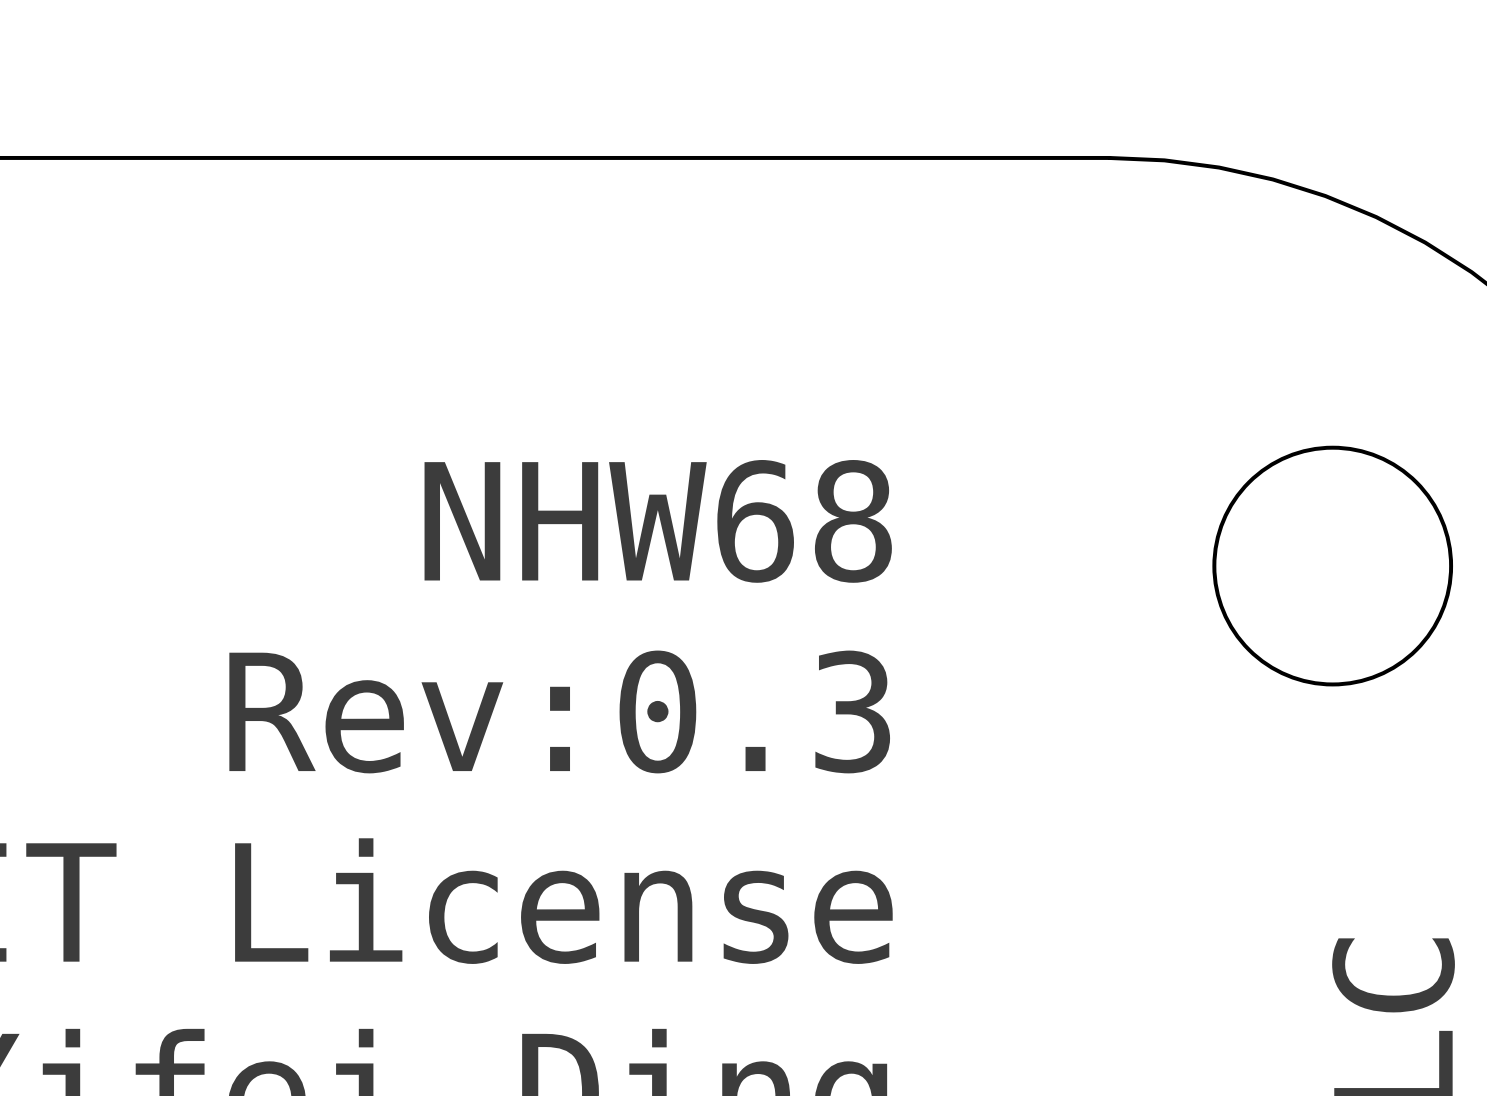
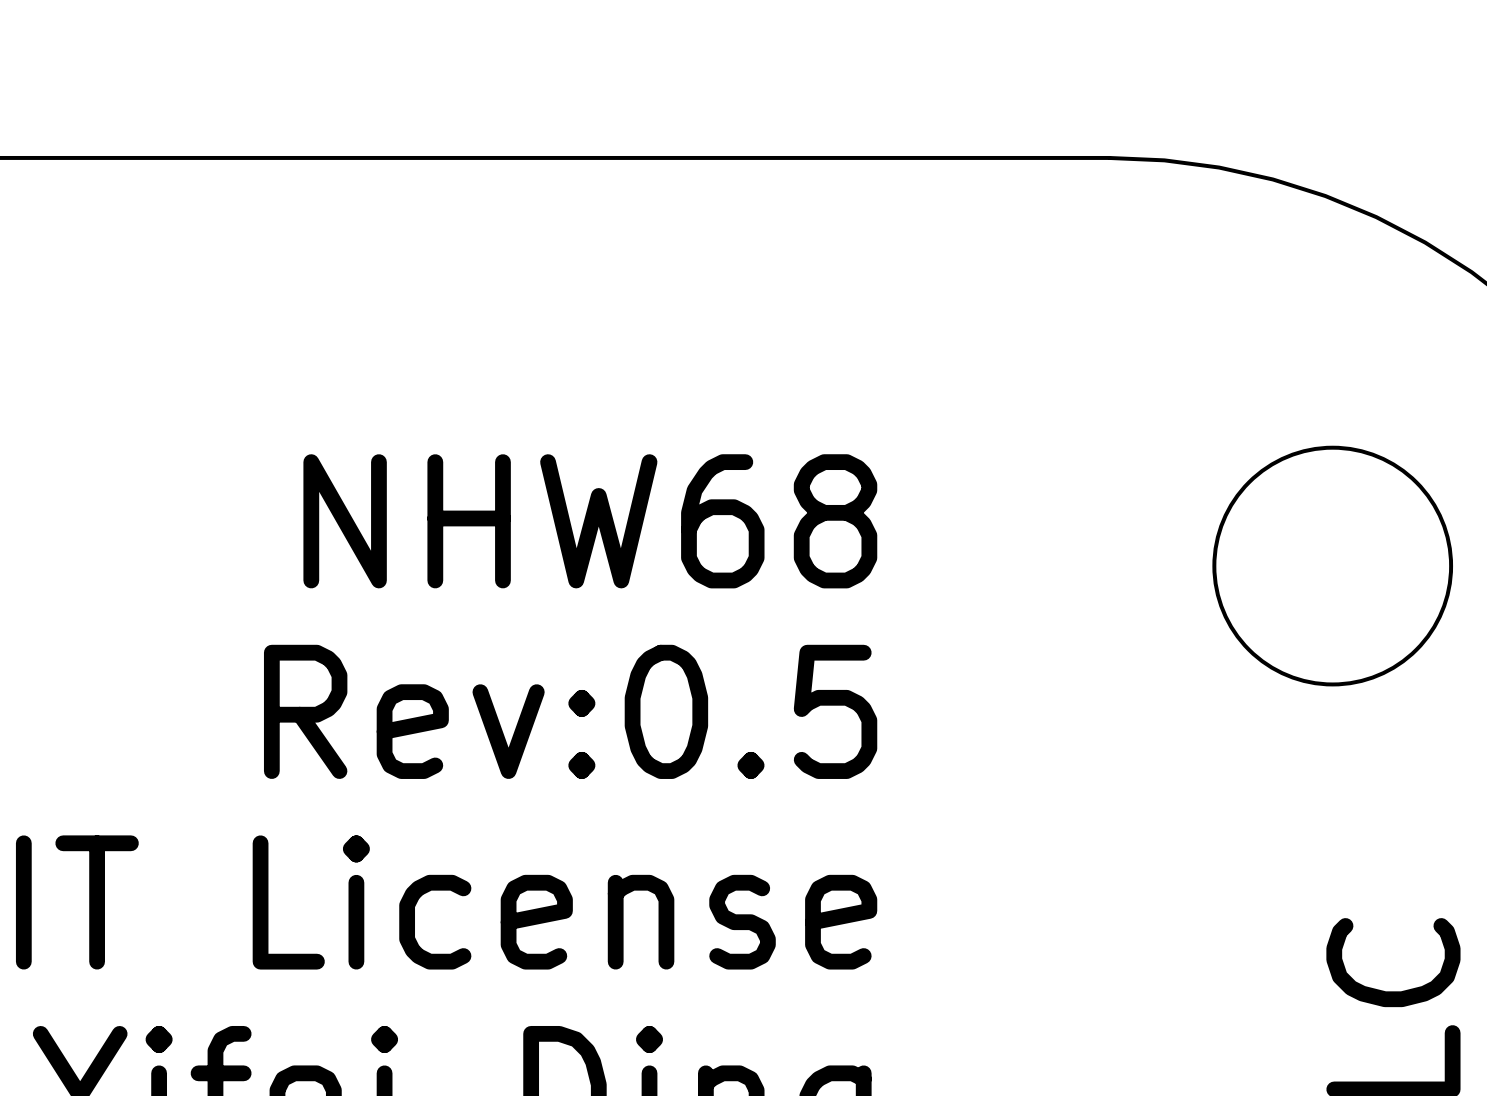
text: Rev:0.3 (559, 711) -> Rev:0.5 (570, 711)

